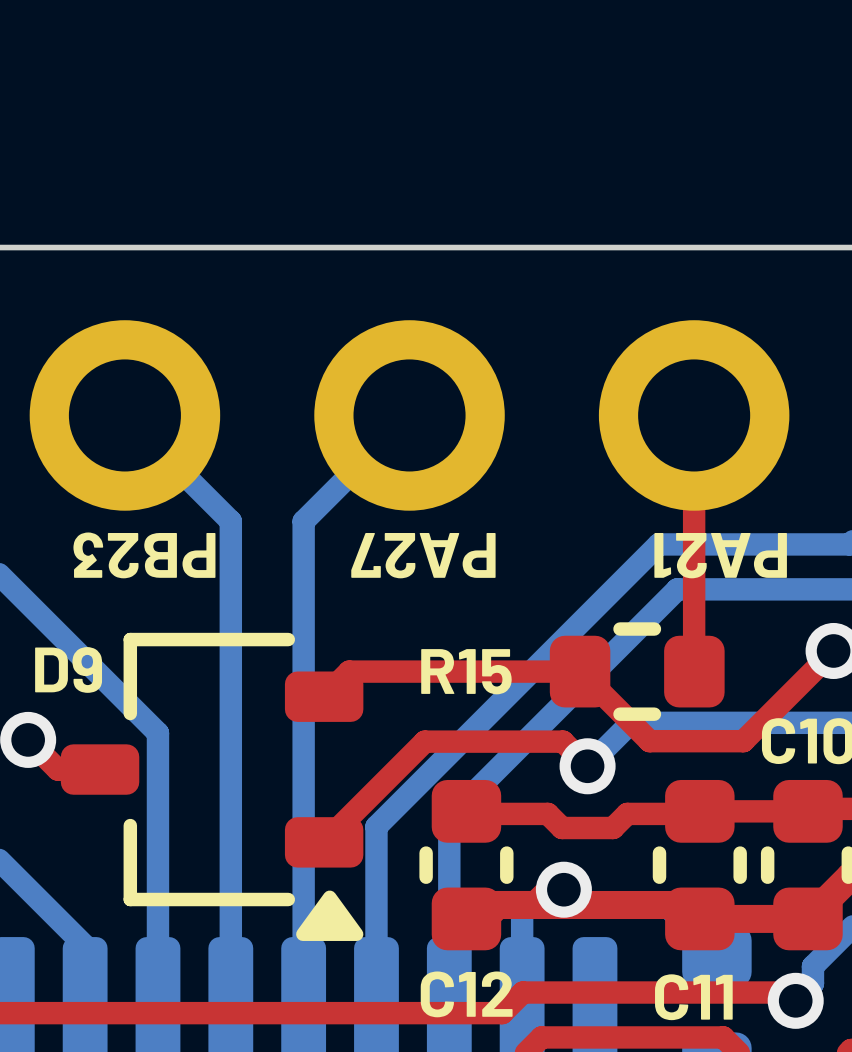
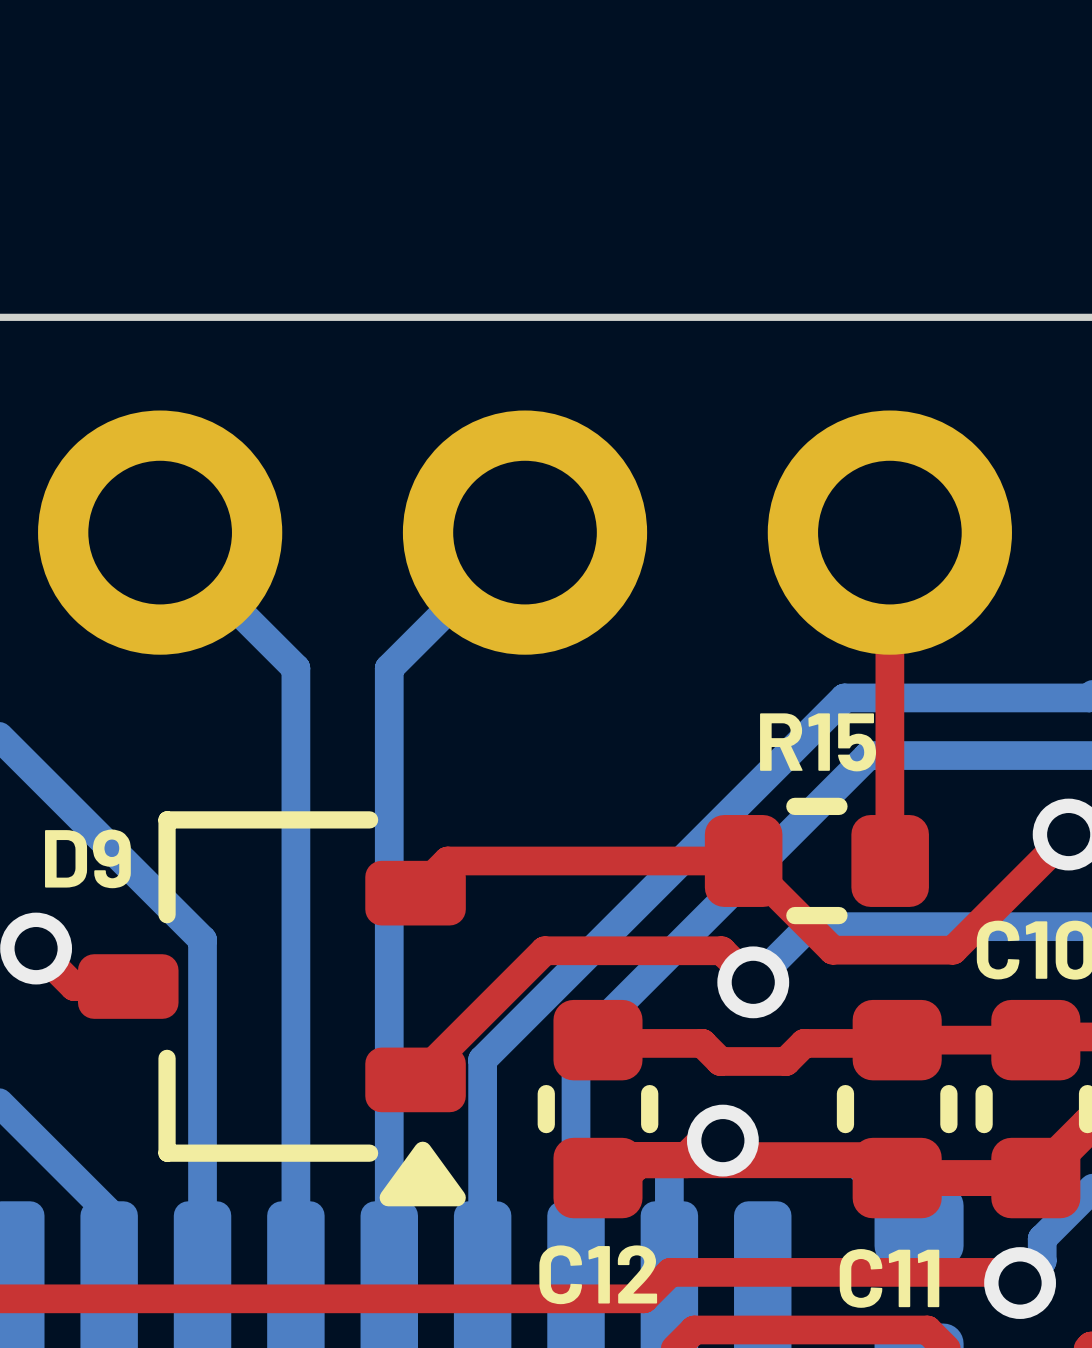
text: PB23 (144, 555) -> none
text: PA27 (423, 555) -> none
text: PA21 (720, 555) -> none
R15 name position: R15 (466, 671) -> R15 (818, 742)

